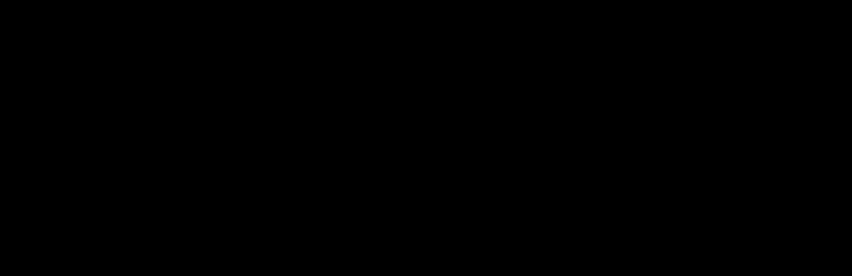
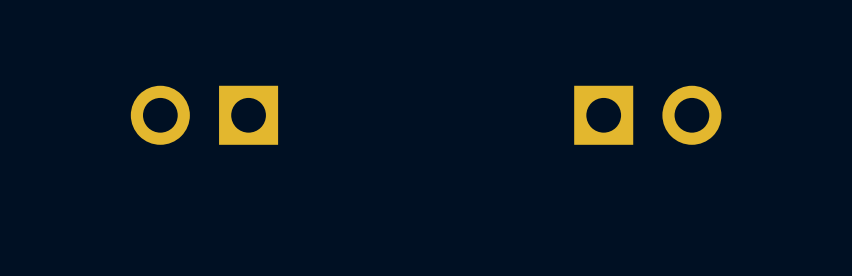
part: none -> (204, 115)
part: none -> (647, 115)

